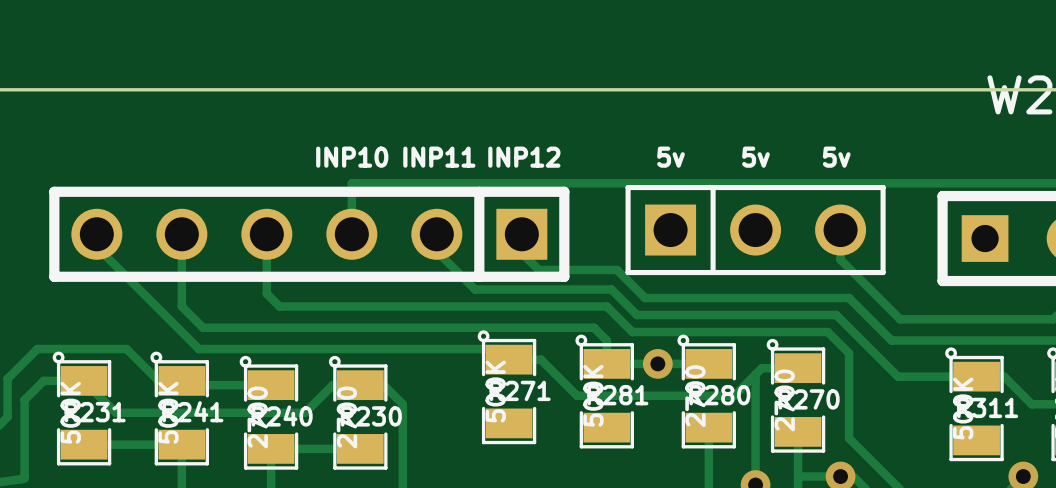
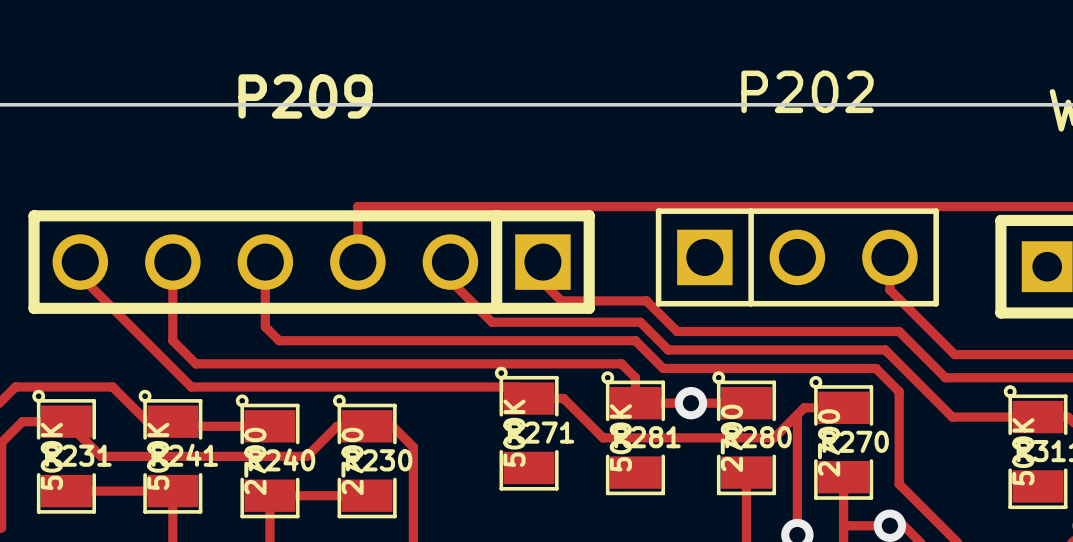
P202 name: none -> P202 (807, 91)
P209 name: none -> P209 (305, 96)
text: INP10 (352, 157) -> none
text: INP11 (439, 157) -> none
text: INP12 (524, 157) -> none
text: 5v (670, 157) -> none
text: 5v (755, 157) -> none
text: 5v (836, 157) -> none

